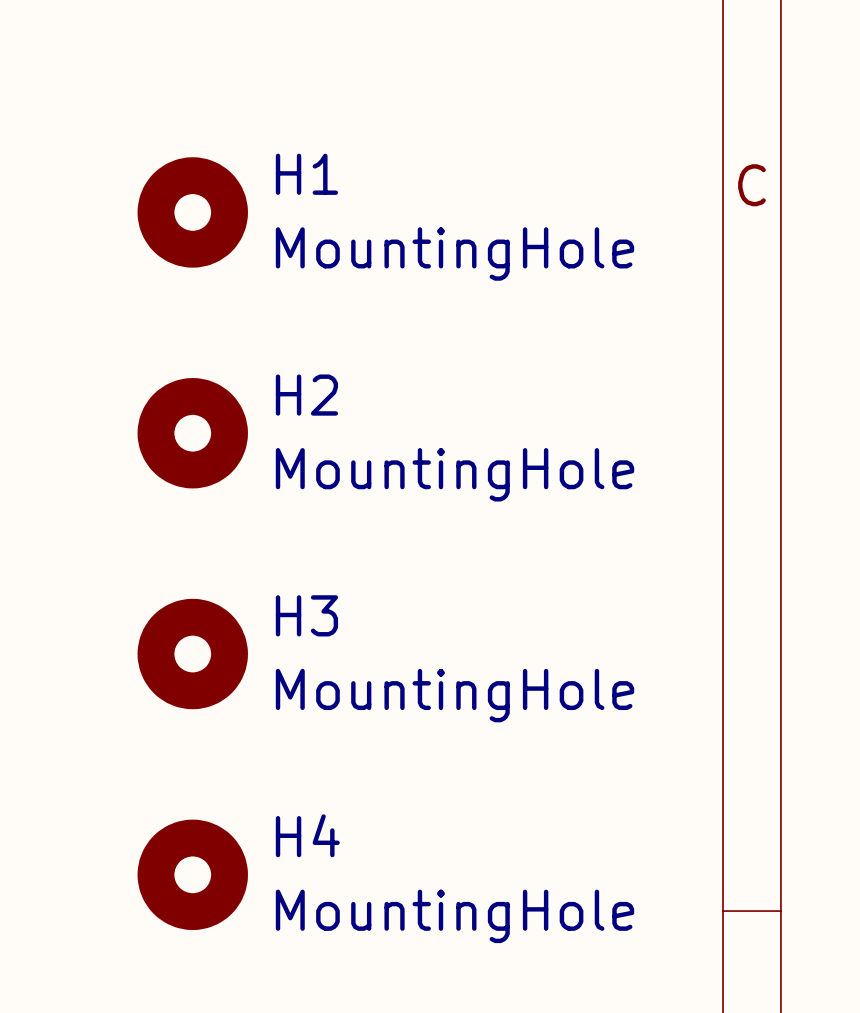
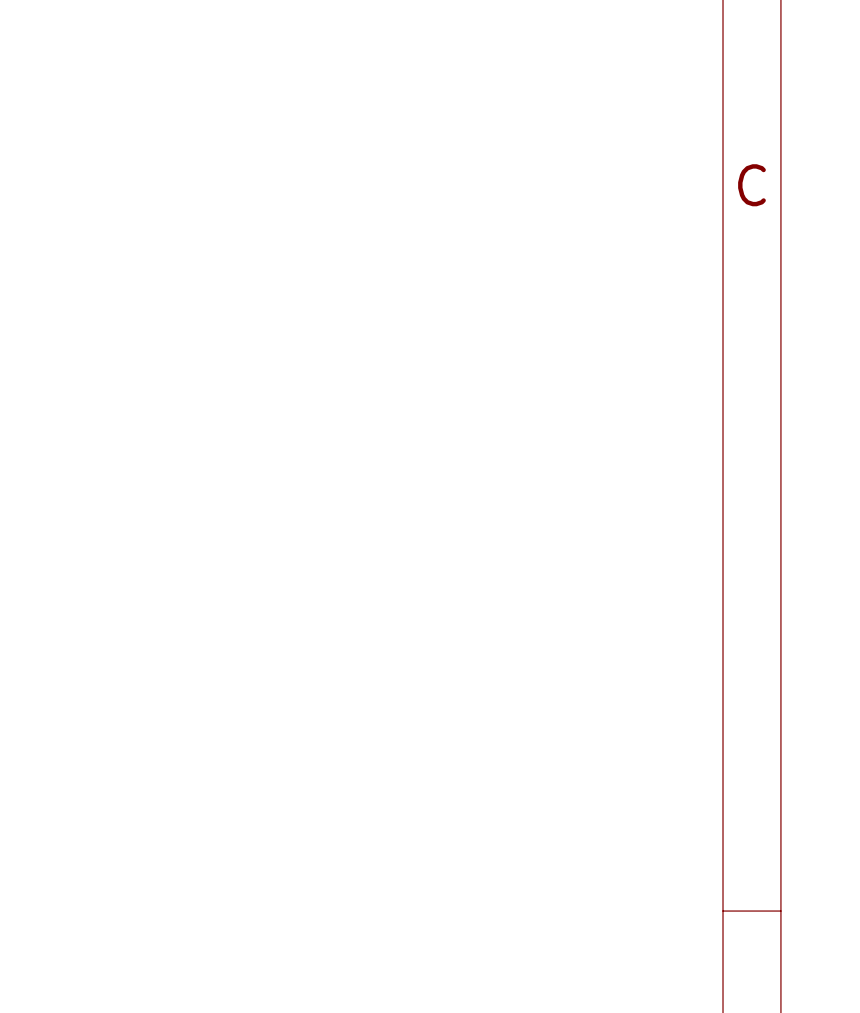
H1: MountingHole (192, 212) -> none
H2: MountingHole (192, 433) -> none
H3: MountingHole (192, 654) -> none
H4: MountingHole (192, 874) -> none

